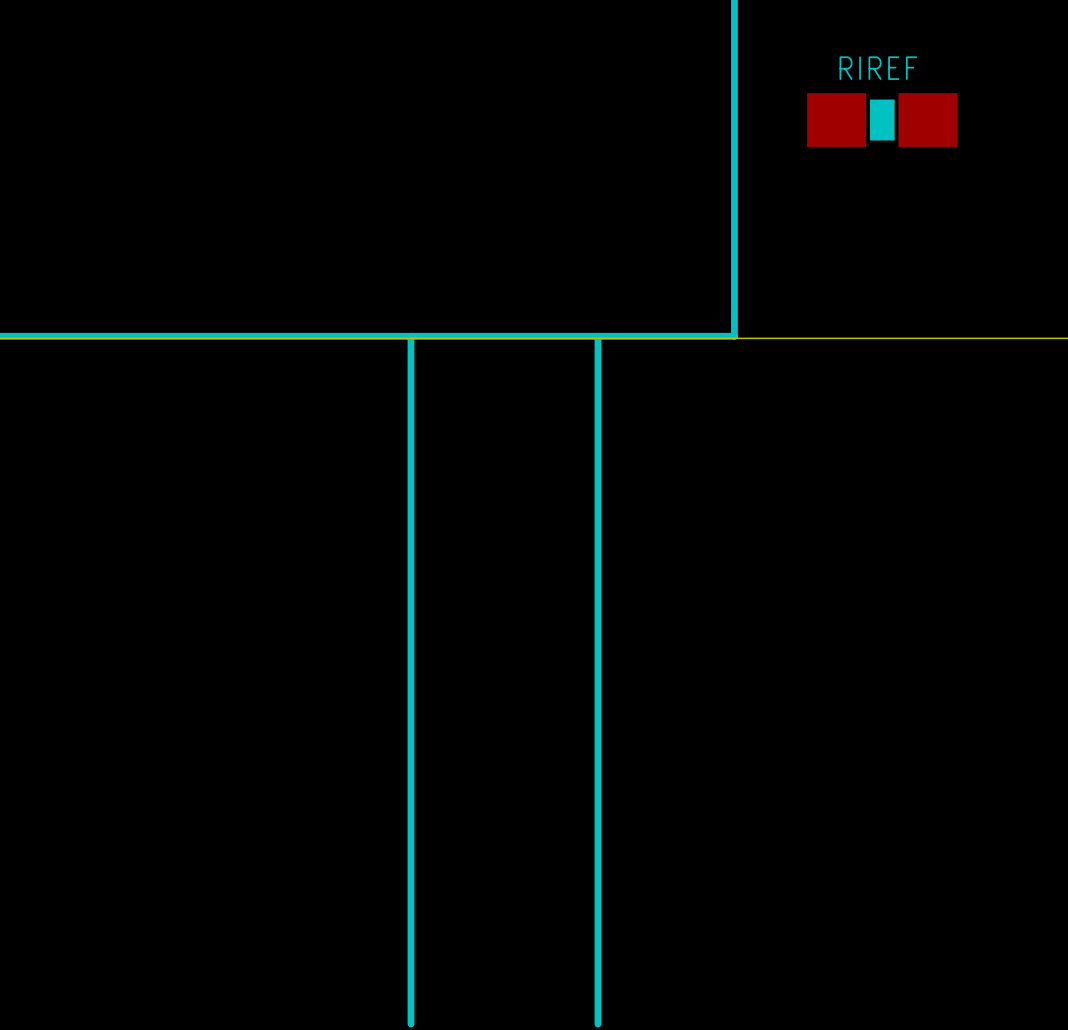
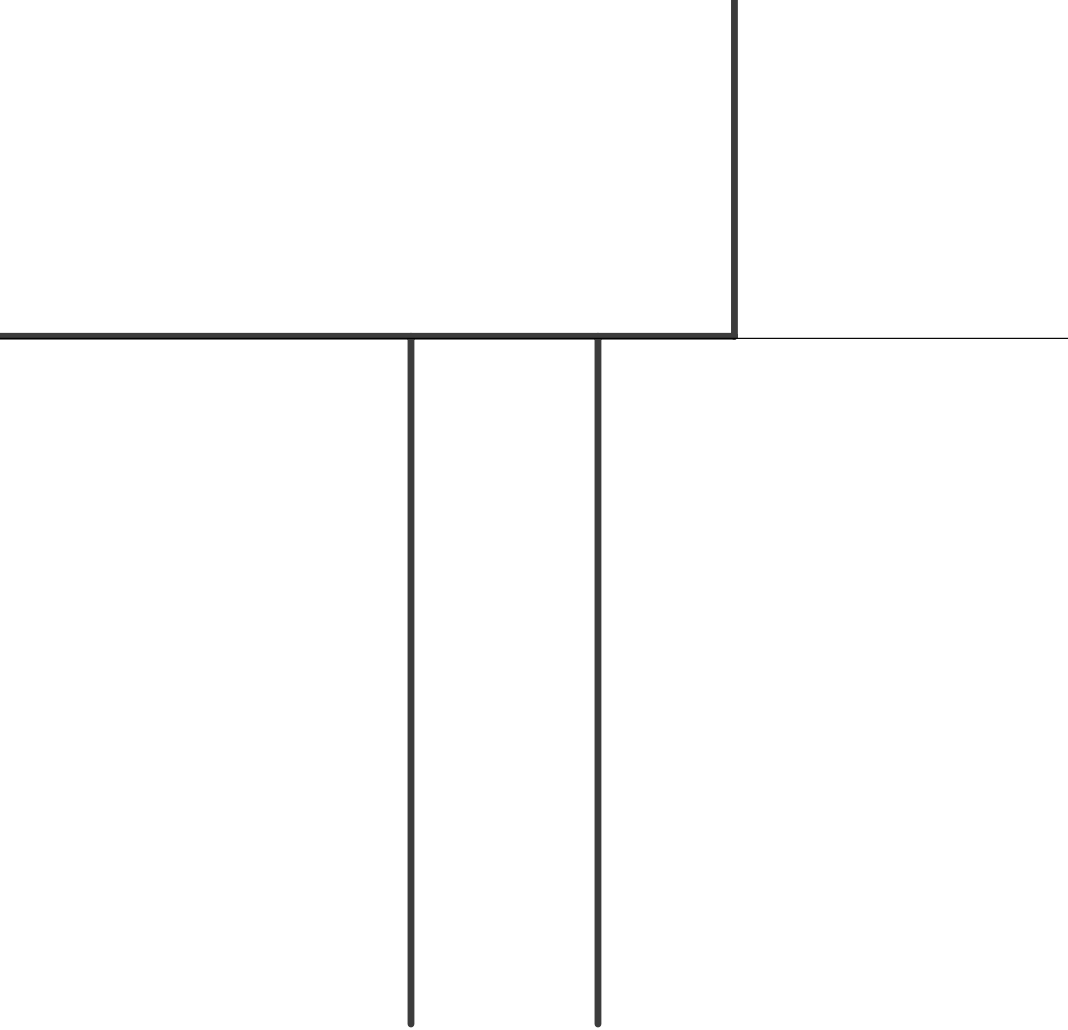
RIREF: (882, 120) -> none

